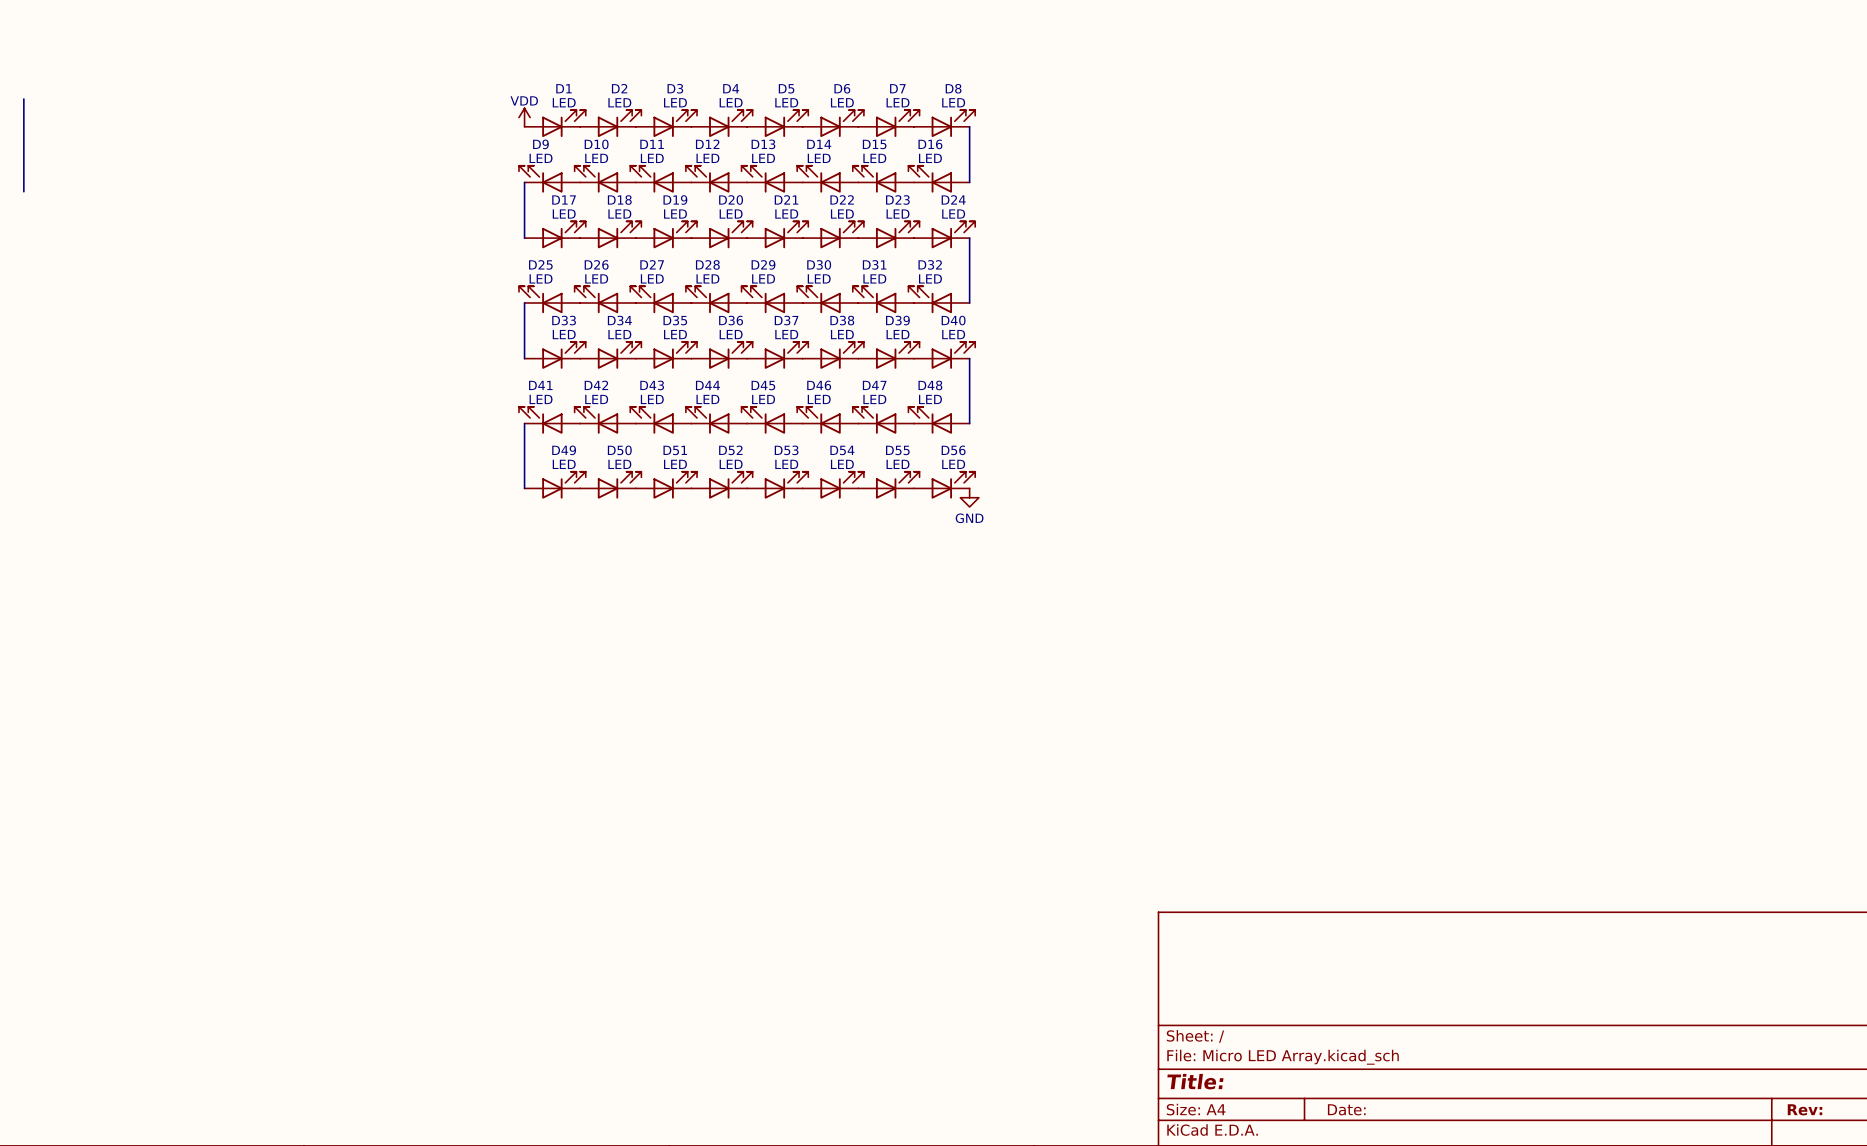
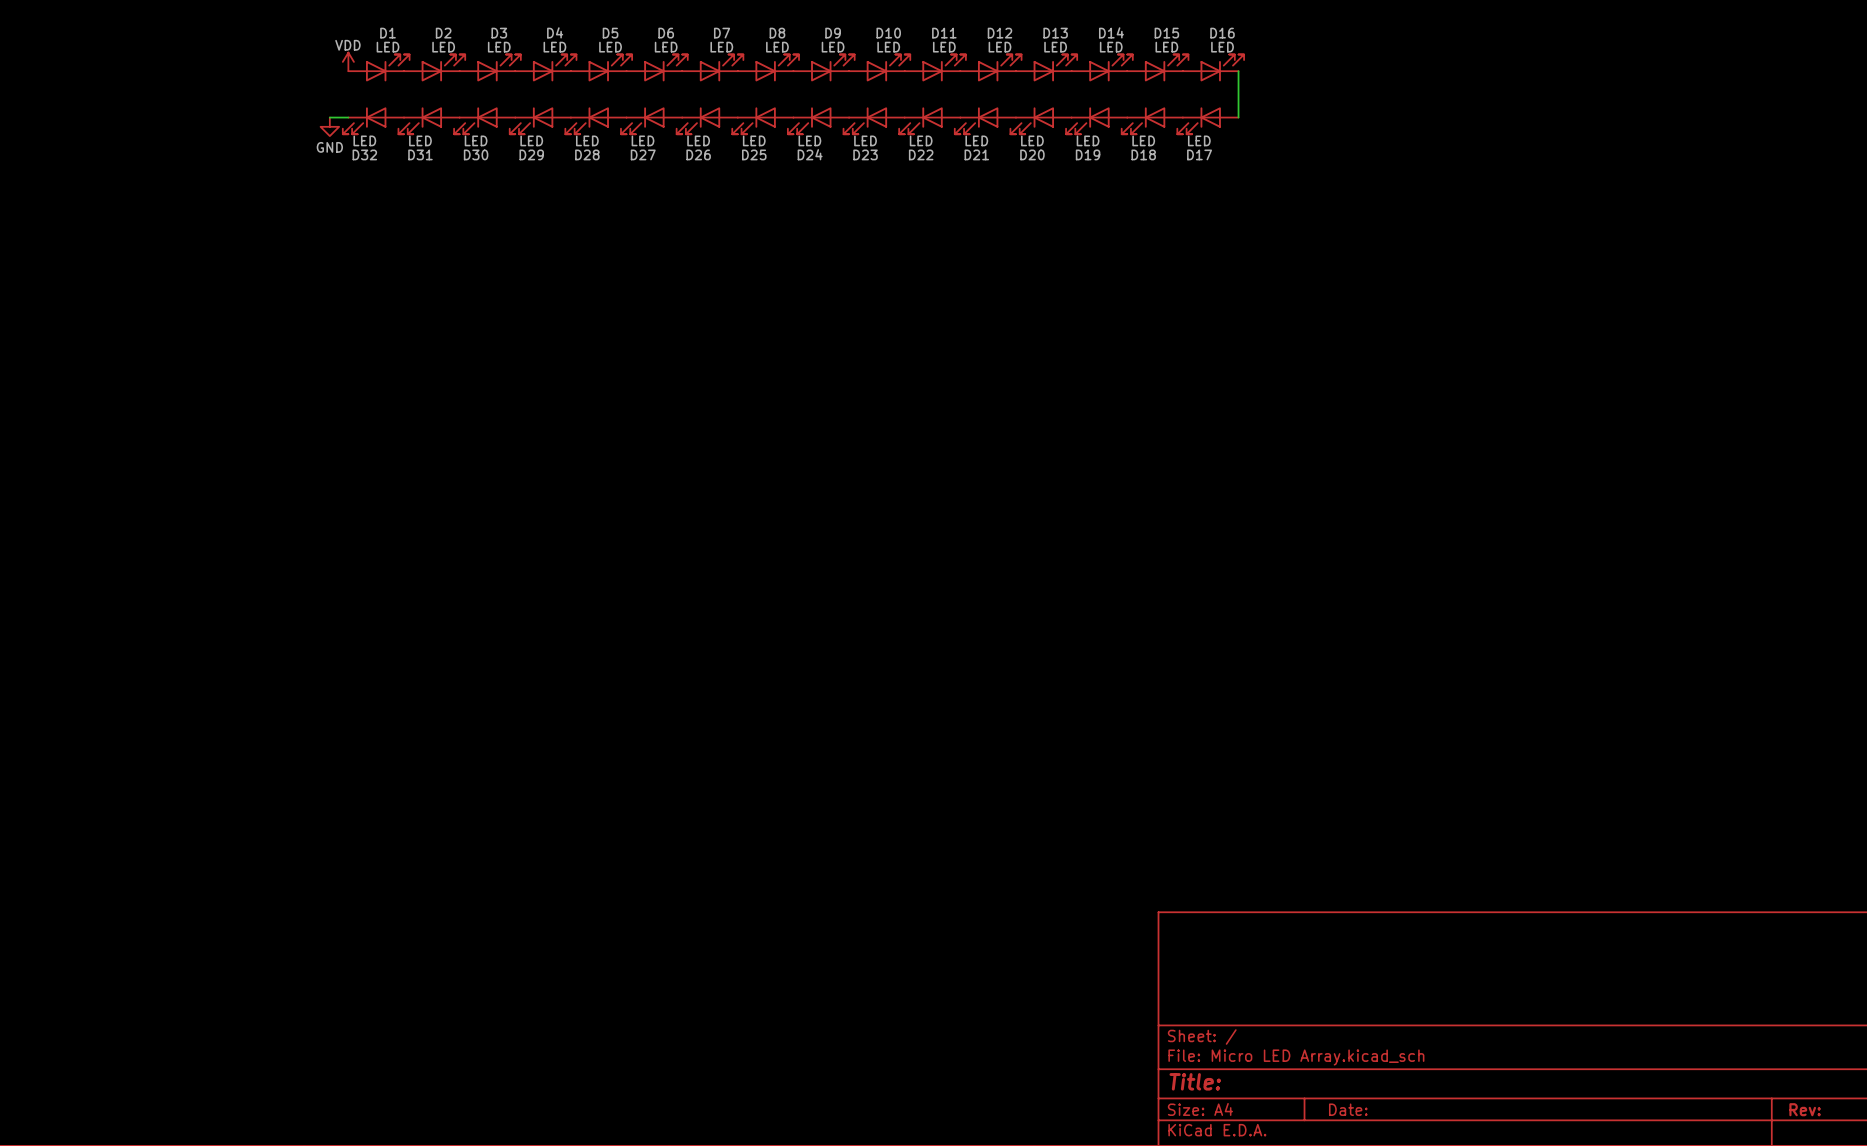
power symbol: none -> VDD (348, 61)
wire: none -> (1238, 71) (1238, 117)
wire: (23, 99) (23, 191) -> none
wire: none -> (329, 117) (348, 117)
power symbol: VDD (524, 117) -> none
D1 position: (555, 123) -> (378, 67)
D2 position: (610, 123) -> (434, 67)
D3 position: (666, 123) -> (490, 67)
D4 position: (722, 123) -> (545, 67)
D5 position: (777, 123) -> (601, 67)
D6 position: (833, 123) -> (657, 67)
D7 position: (888, 123) -> (712, 67)
D8 position: (944, 123) -> (768, 67)
power symbol: none -> GND (329, 126)
wire: (969, 126) (969, 182) -> none
D9 flip: as is (540, 179) -> left-right (832, 67)
D9 position: (549, 179) -> (824, 67)
D10 flip: as is (596, 179) -> left-right (888, 67)
D10 position: (605, 179) -> (879, 67)
D11 flip: as is (652, 179) -> left-right (944, 67)
D11 position: (660, 179) -> (935, 67)
D12 flip: as is (707, 179) -> left-right (999, 67)
D12 position: (716, 179) -> (990, 67)
D13 flip: as is (763, 179) -> left-right (1055, 67)
D13 position: (772, 179) -> (1046, 67)
D14 flip: as is (818, 179) -> left-right (1111, 67)
D14 position: (827, 179) -> (1102, 67)
D15 flip: as is (874, 179) -> left-right (1166, 67)
D15 position: (883, 179) -> (1157, 67)
D16 flip: as is (930, 179) -> left-right (1222, 67)
D16 position: (939, 179) -> (1213, 67)
wire: (524, 182) (524, 238) -> none
D17 position: (555, 234) -> (1207, 120)
D17 rotation: 0° (563, 234) -> 180° (1199, 120)
D18 position: (610, 234) -> (1152, 120)
D18 rotation: 0° (619, 234) -> 180° (1143, 120)
D19 position: (666, 234) -> (1096, 120)
D19 rotation: 0° (675, 234) -> 180° (1087, 120)
D20 position: (722, 234) -> (1041, 120)
D20 rotation: 0° (730, 234) -> 180° (1032, 120)
D21 position: (777, 234) -> (985, 120)
D21 rotation: 0° (786, 234) -> 180° (976, 120)
D22 position: (833, 234) -> (929, 120)
D22 rotation: 0° (842, 234) -> 180° (920, 120)
D23 position: (888, 234) -> (874, 120)
D23 rotation: 0° (897, 234) -> 180° (865, 120)
D24 position: (944, 234) -> (818, 120)
D24 rotation: 0° (953, 234) -> 180° (809, 120)
wire: (969, 238) (969, 302) -> none
D25 flip: as is (540, 299) -> up-down (754, 120)
D25 position: (549, 299) -> (762, 120)
D26 flip: as is (596, 299) -> up-down (698, 120)
D26 position: (605, 299) -> (707, 120)
D27 flip: as is (652, 299) -> up-down (642, 120)
D27 position: (660, 299) -> (651, 120)
D28 flip: as is (707, 299) -> up-down (587, 120)
D28 position: (716, 299) -> (595, 120)
D29 flip: as is (763, 299) -> up-down (531, 120)
D29 position: (772, 299) -> (540, 120)
D30 flip: as is (818, 299) -> up-down (475, 120)
D30 position: (827, 299) -> (484, 120)
D31 flip: as is (874, 299) -> up-down (420, 120)
D31 position: (883, 299) -> (429, 120)
D32 flip: as is (930, 299) -> up-down (364, 120)
D32 position: (939, 299) -> (373, 120)
wire: (524, 302) (524, 358) -> none
D33: LED (555, 355) -> none
D34: LED (610, 355) -> none
D35: LED (666, 355) -> none
D36: LED (722, 355) -> none
D37: LED (777, 355) -> none
D38: LED (833, 355) -> none
D39: LED (888, 355) -> none
D40: LED (944, 355) -> none
wire: (969, 358) (969, 423) -> none
D41: LED (549, 420) -> none
D42: LED (605, 420) -> none
D43: LED (660, 420) -> none
D44: LED (716, 420) -> none
D45: LED (772, 420) -> none
D46: LED (827, 420) -> none
D47: LED (883, 420) -> none
D48: LED (939, 420) -> none
wire: (524, 423) (524, 488) -> none
D49: LED (555, 485) -> none
D50: LED (610, 485) -> none
D51: LED (666, 485) -> none
D52: LED (722, 485) -> none
D53: LED (777, 485) -> none
D54: LED (833, 485) -> none
D55: LED (888, 485) -> none
D56: LED (944, 485) -> none
power symbol: GND (969, 497) -> none

